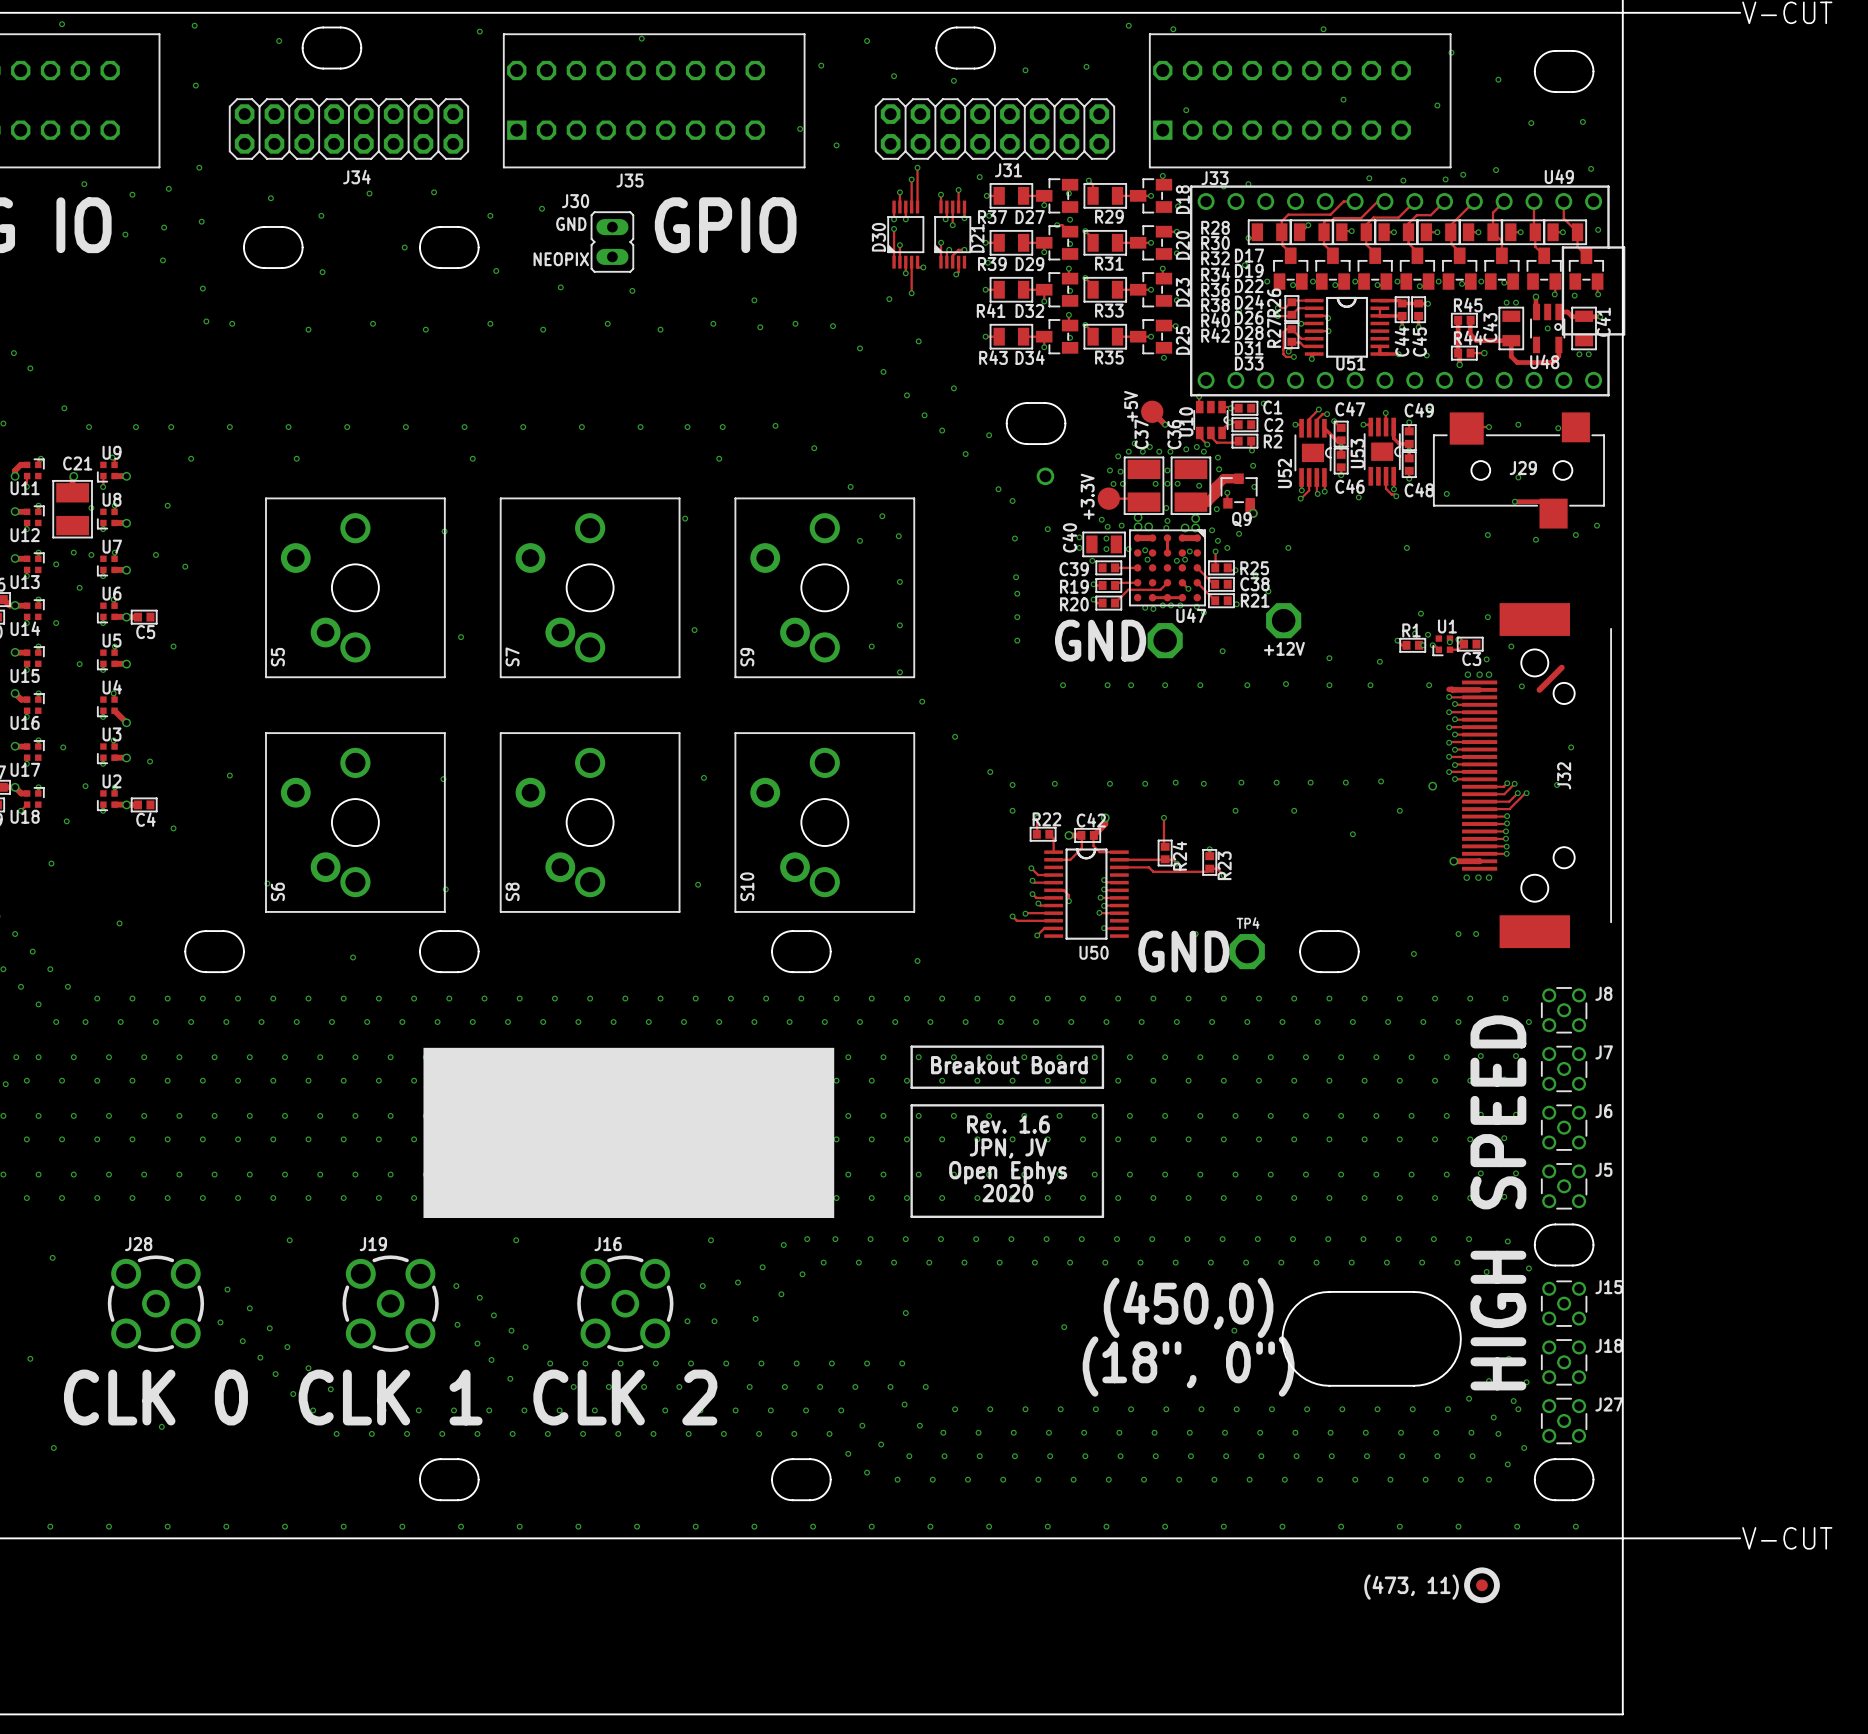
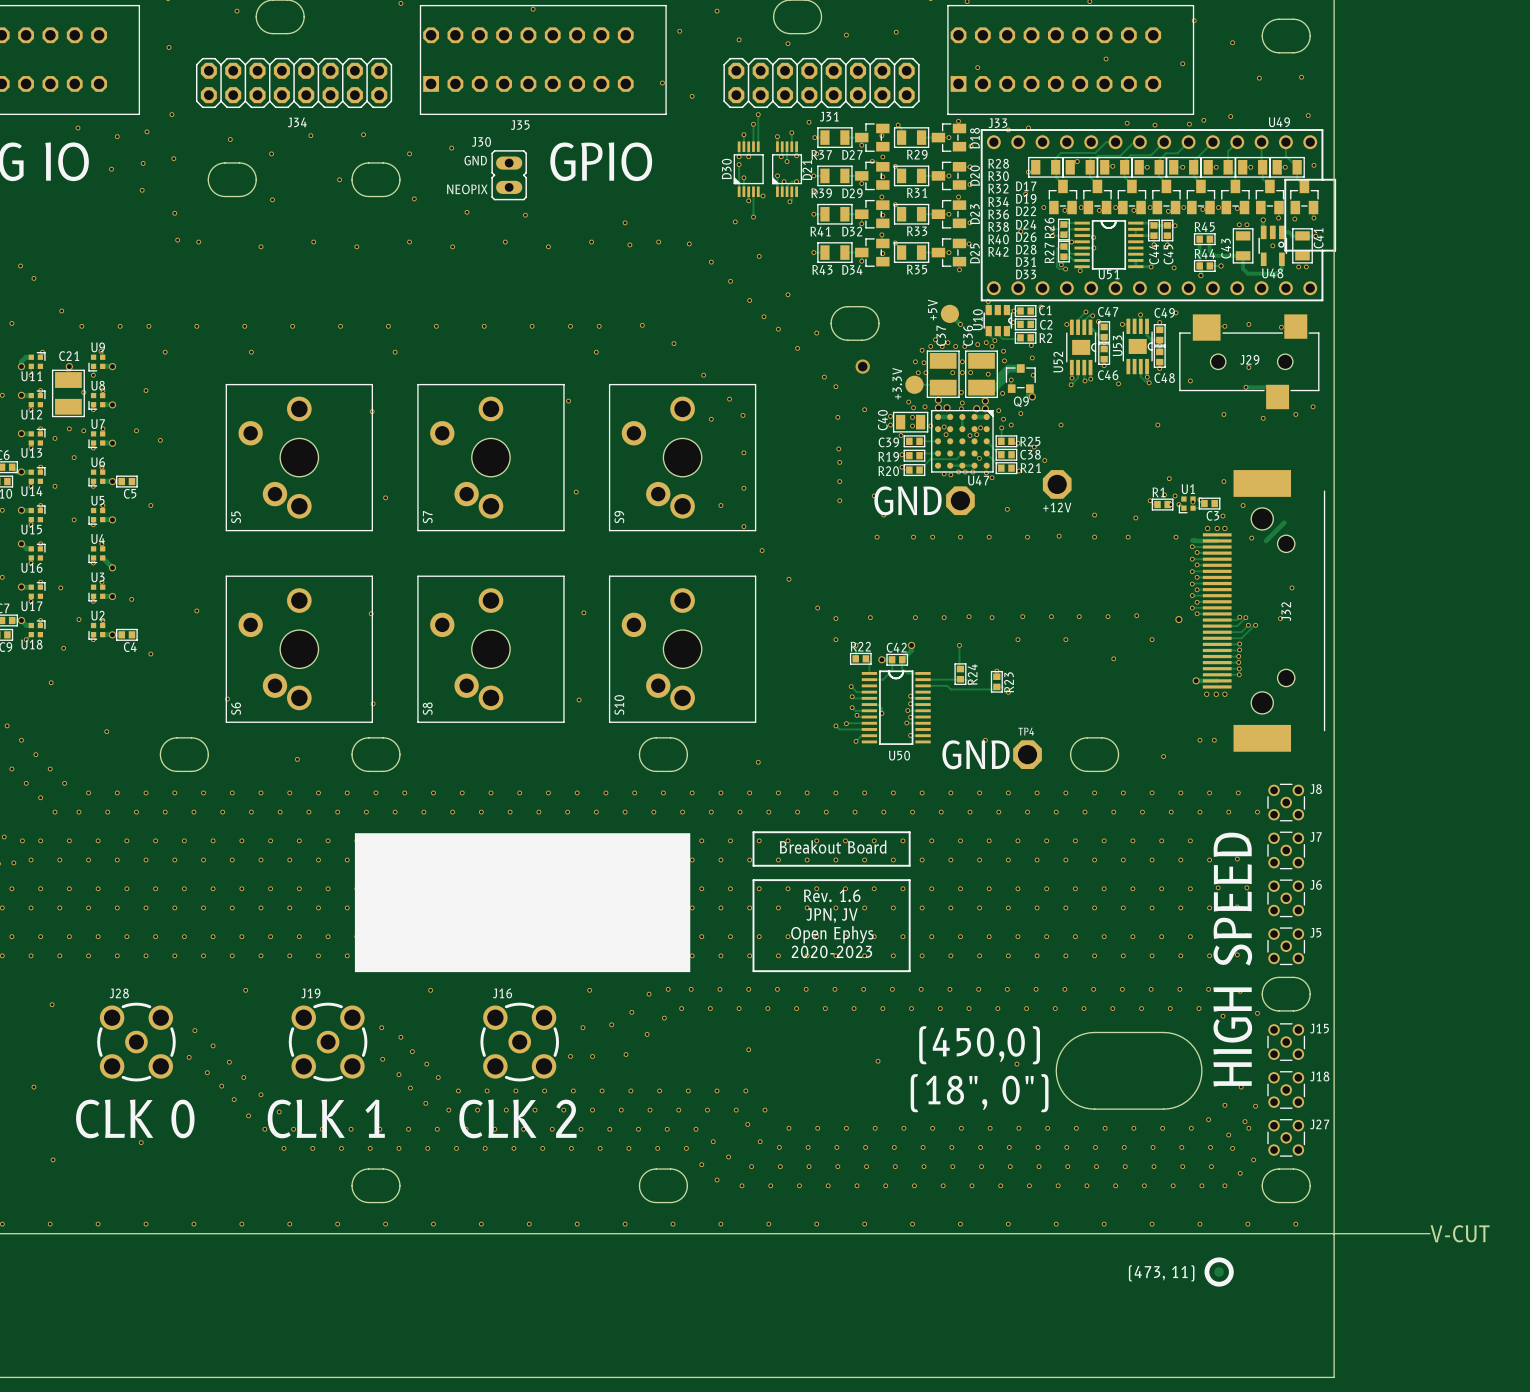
text: 2020 (1007, 1193) -> 2020-2023 (831, 951)

